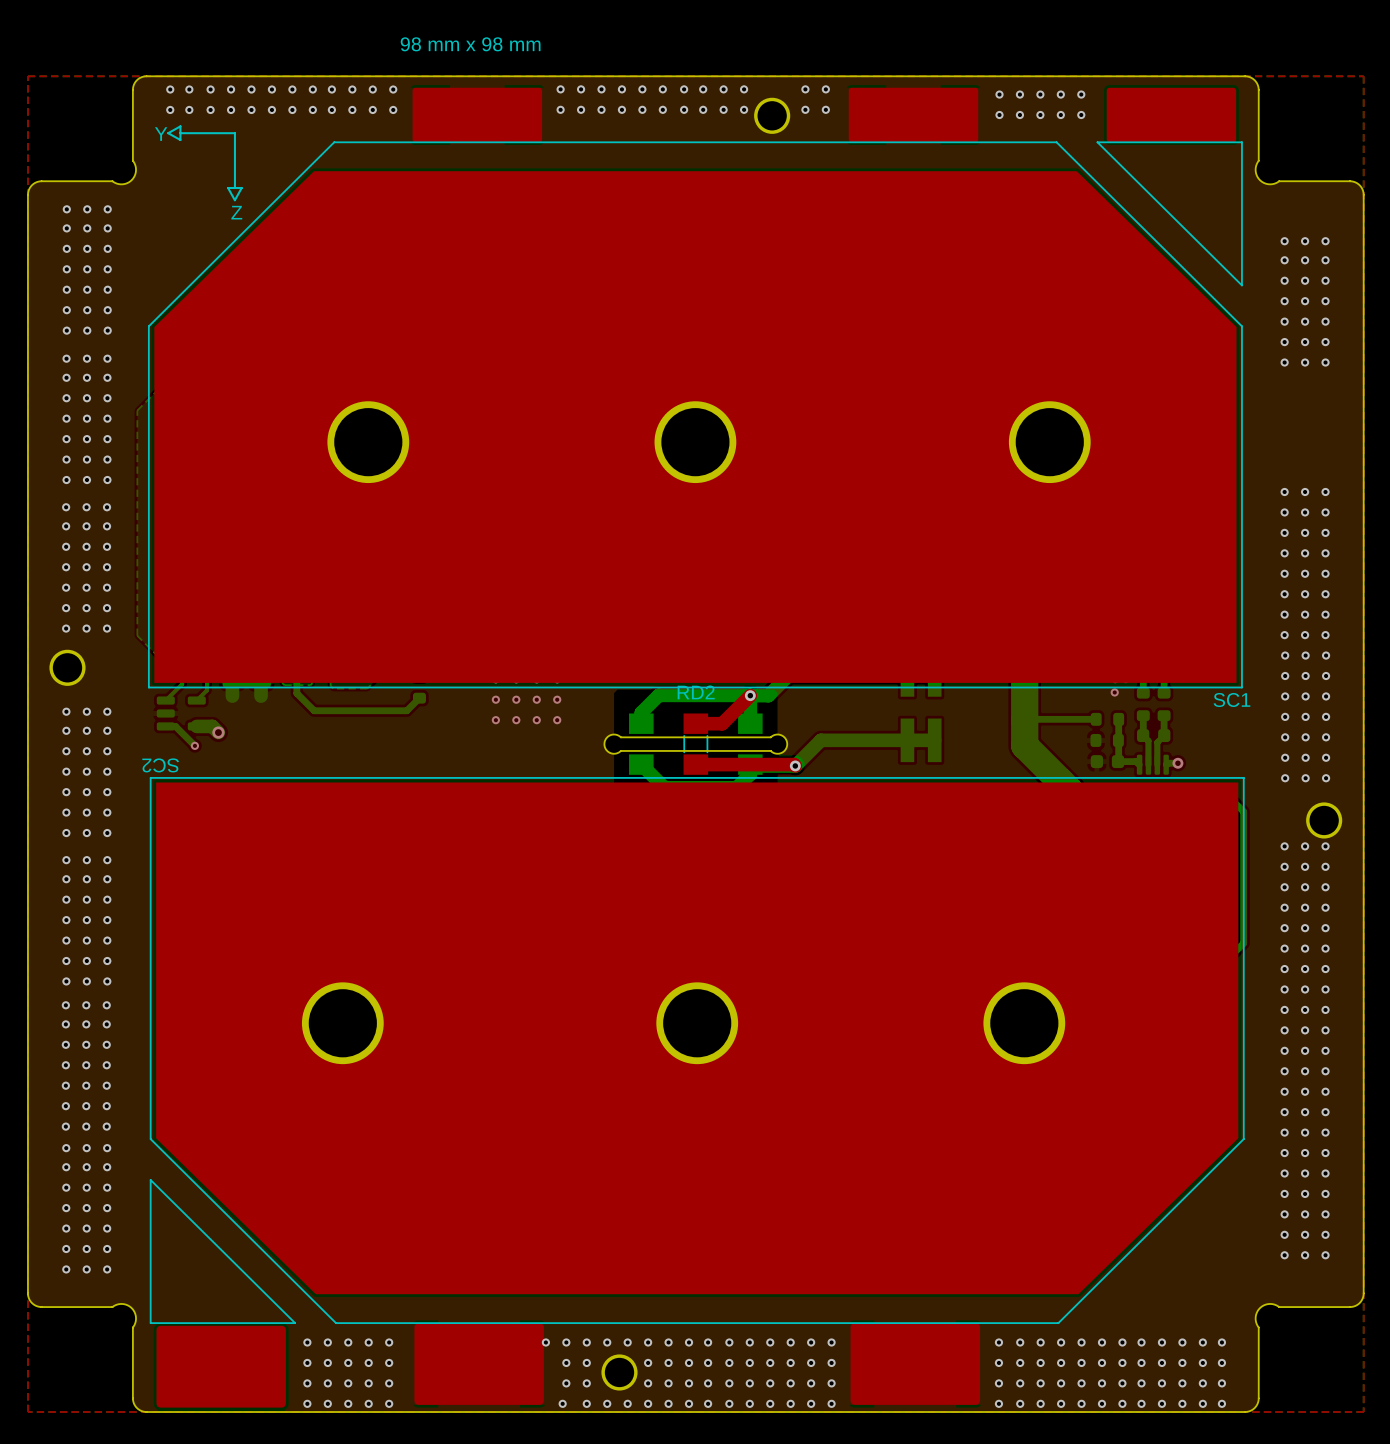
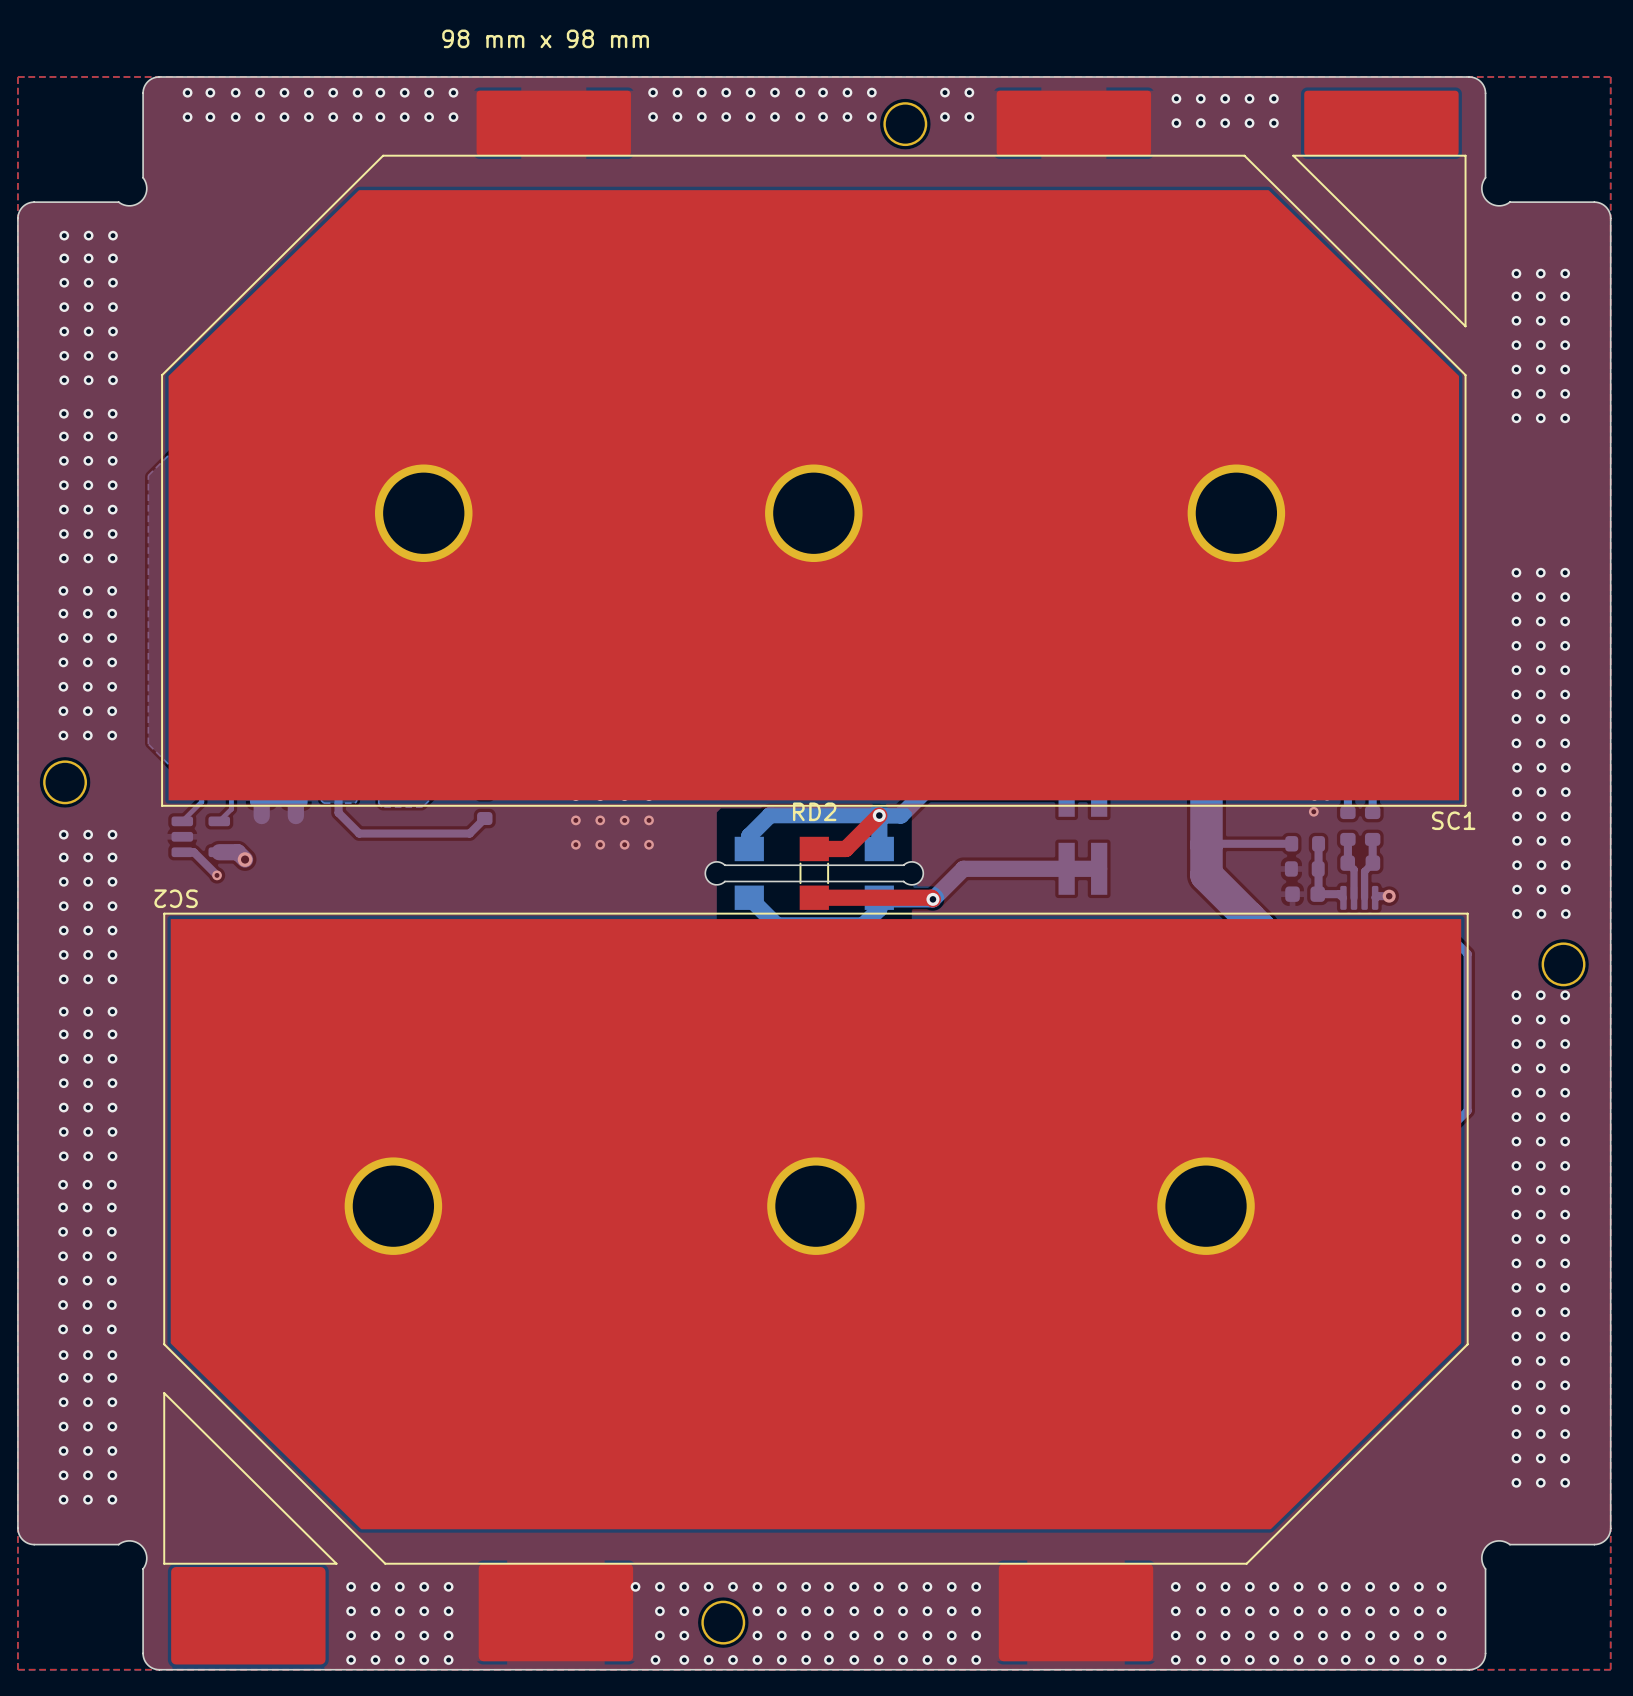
drawing: [27, 75, 1365, 1413] -> none
line: (180, 126) (168, 133) (180, 140) (180, 126) -> none
line: (180, 133) (234, 133) (234, 187) -> none
text: Y (161, 134) -> none
line: (228, 188) (234, 200) (241, 188) (228, 188) -> none
text: Z (236, 212) -> none
part: none -> (814, 873)

